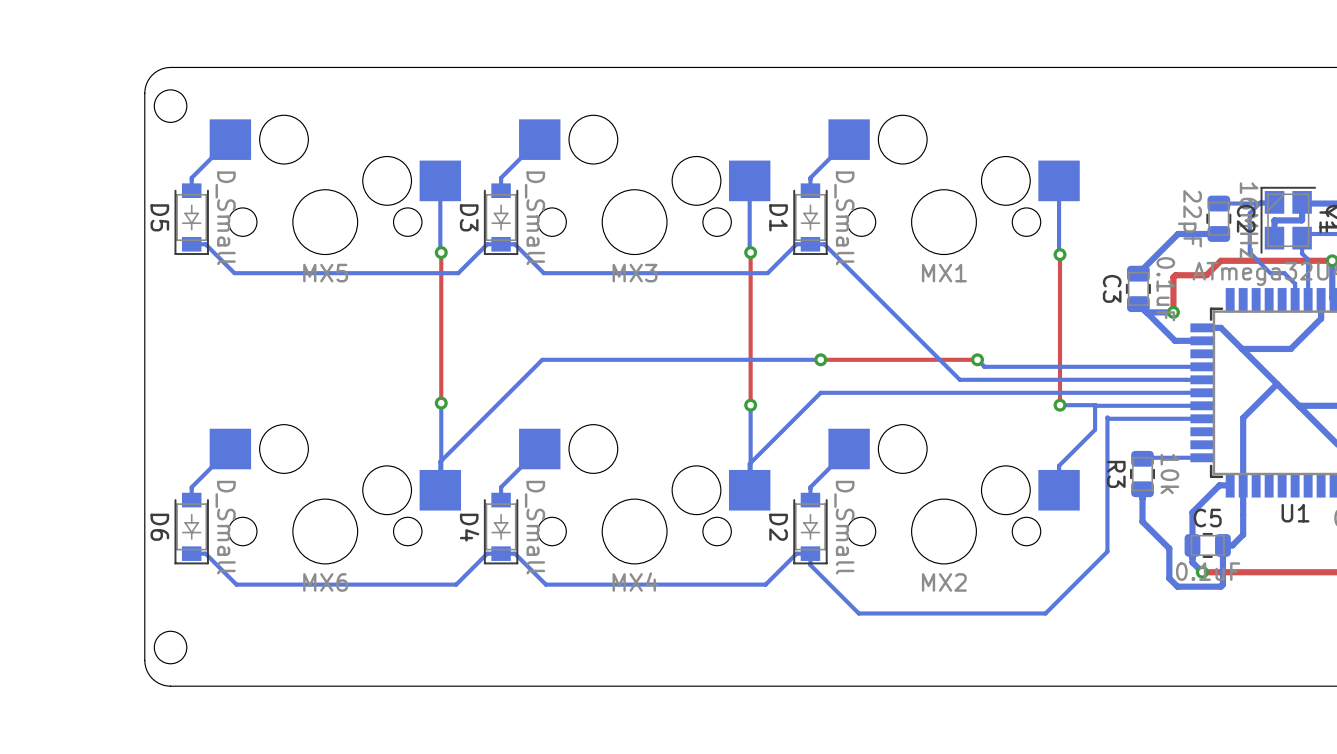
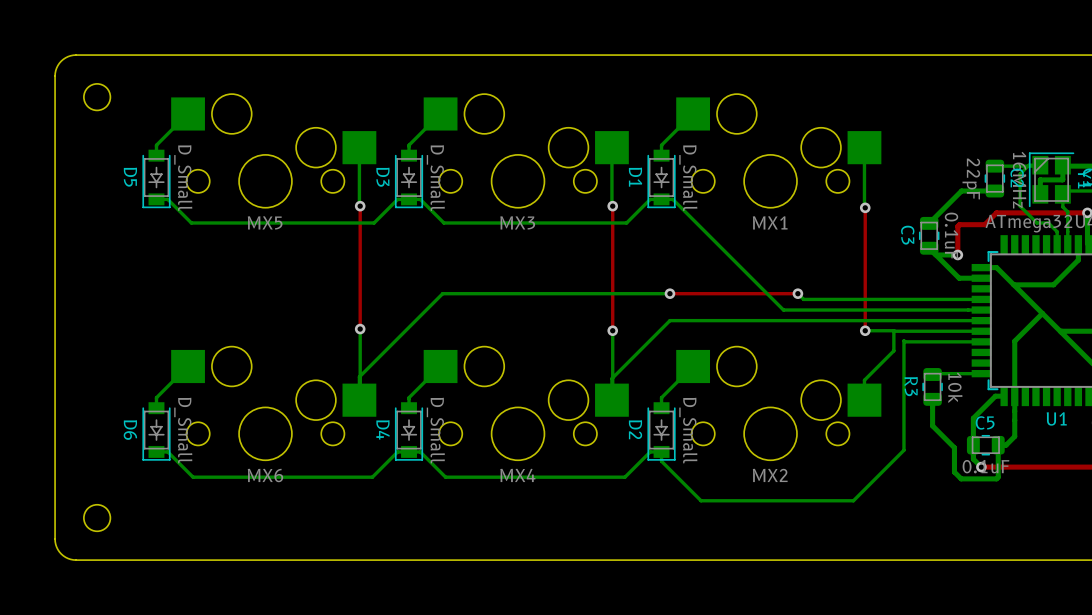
board edge: (170, 67) (160, 69) (152, 75) (146, 83) (144, 93) (144, 660) (146, 670) (152, 678) (160, 684) (170, 686) -> (139, 55) (70, 55) (59, 63) (55, 76) (55, 541) (59, 551) (70, 559) (139, 560)
round board edge position: (170, 106) -> (97, 97)
round board edge position: (170, 647) -> (97, 518)

